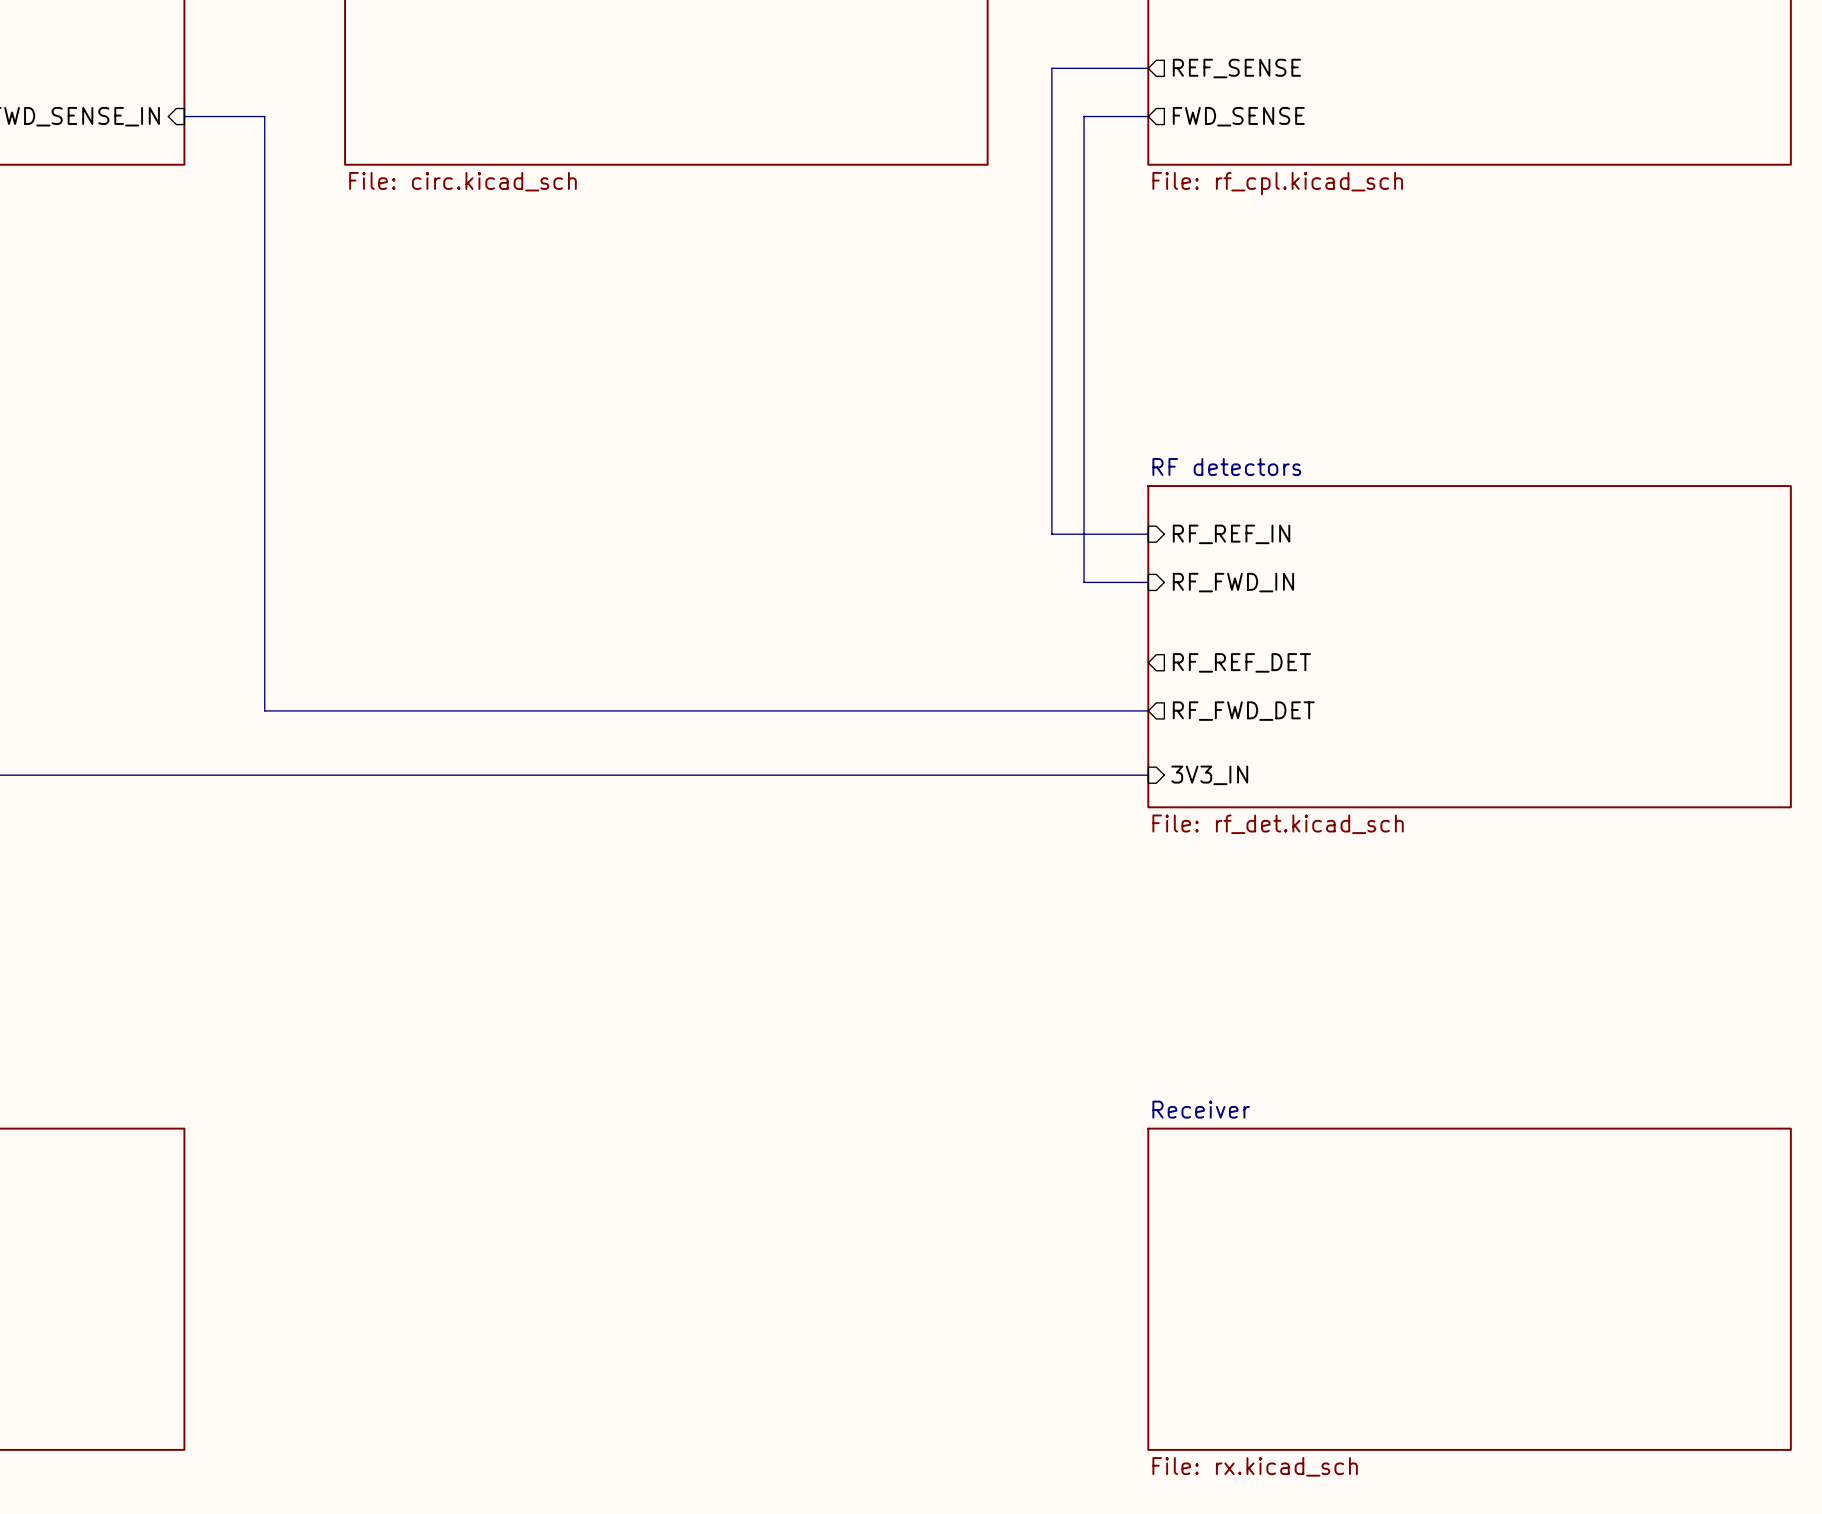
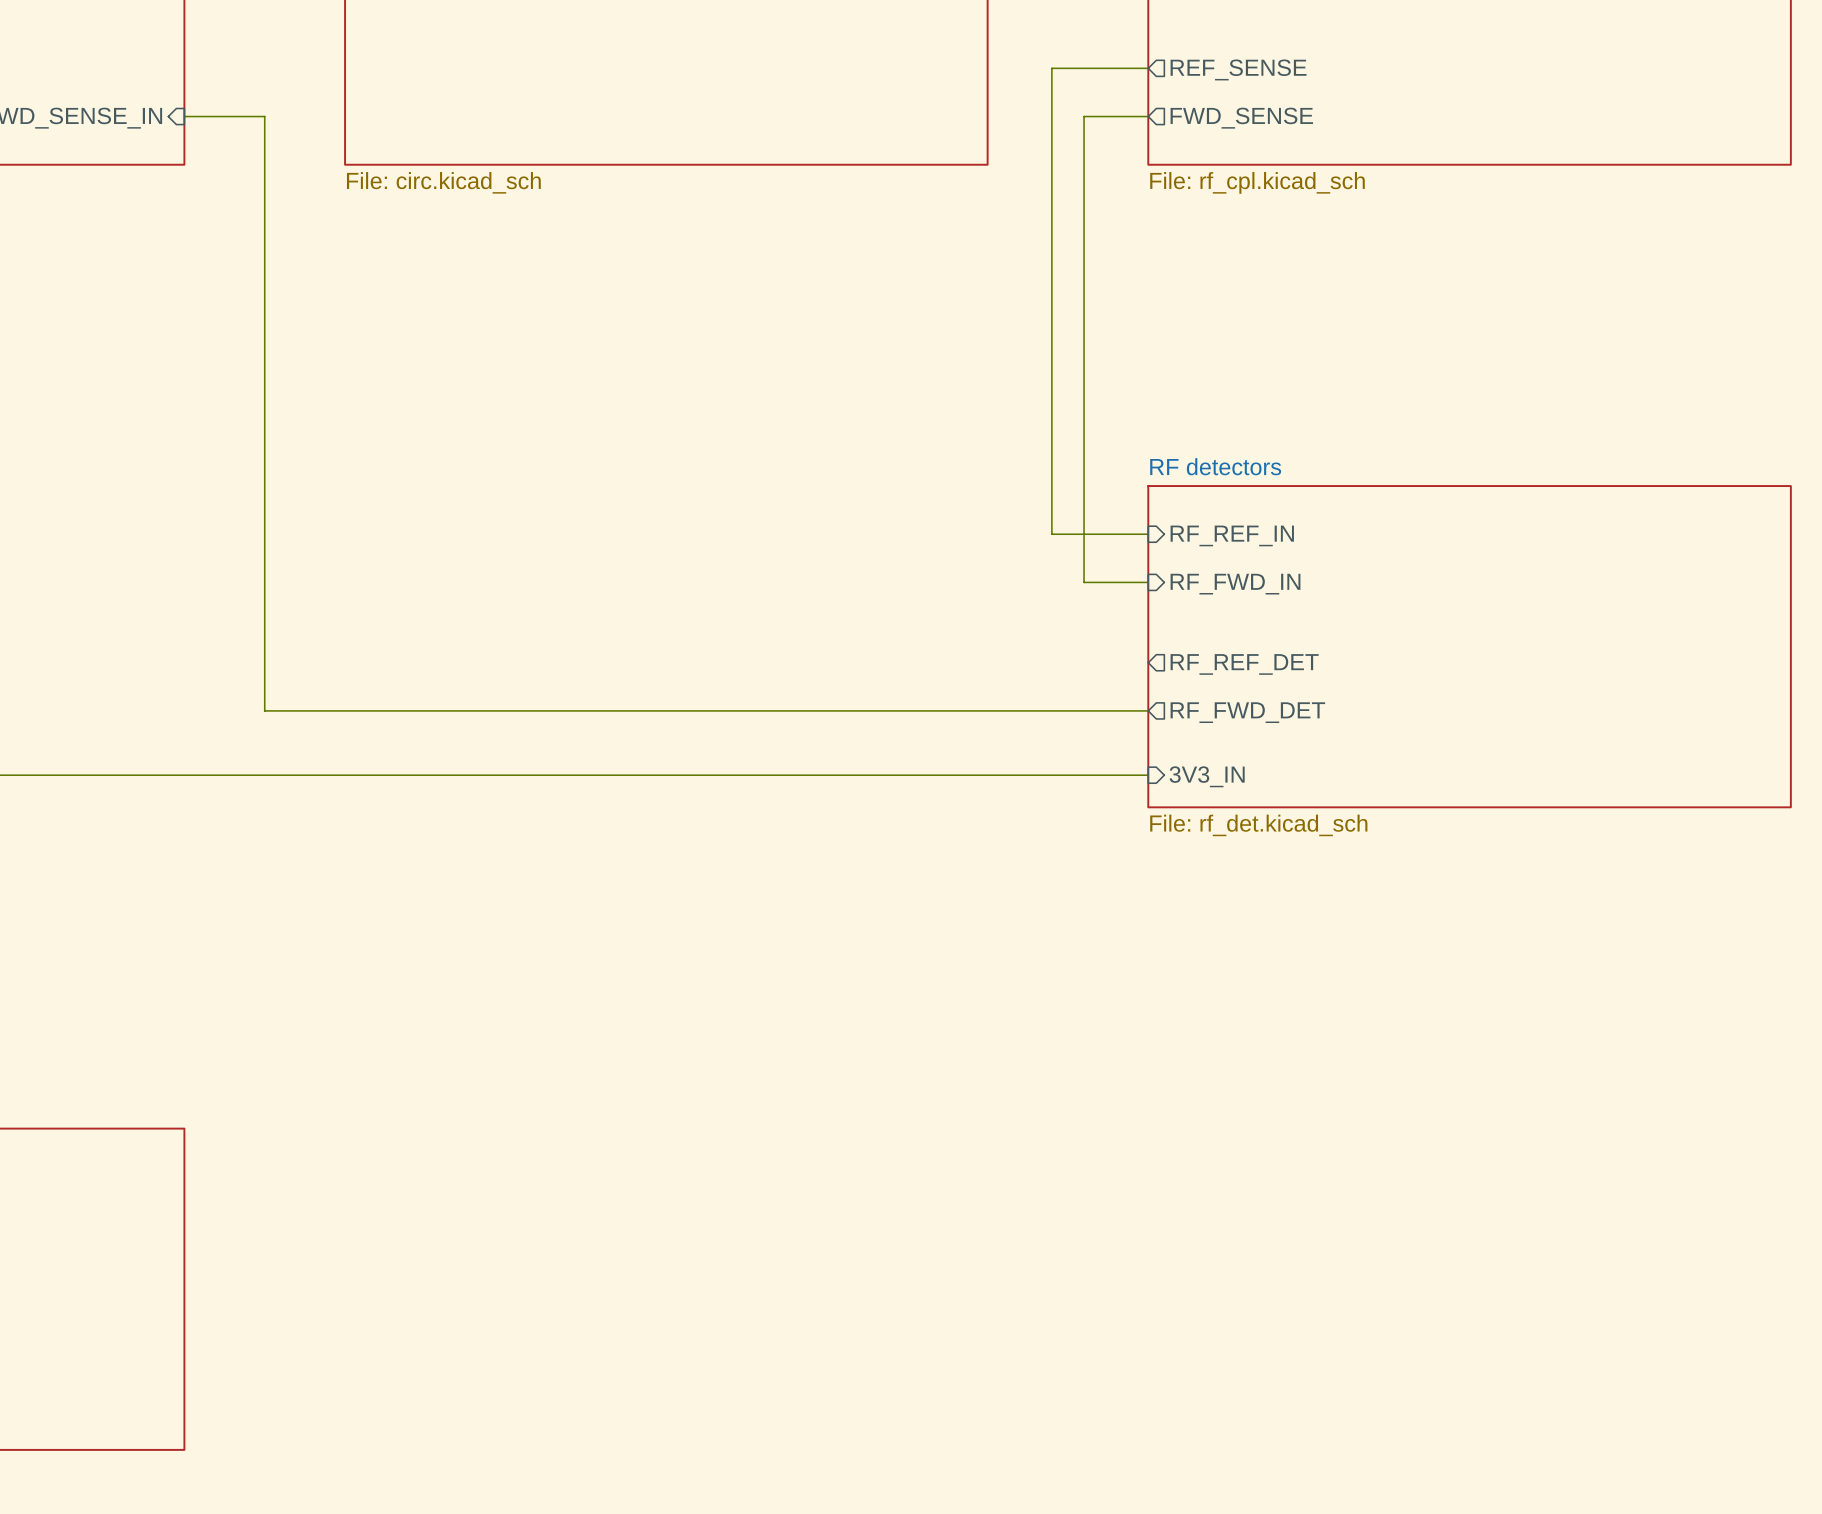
sheet Receiver: File: rx.kicad_sch (1469, 1289) -> none

